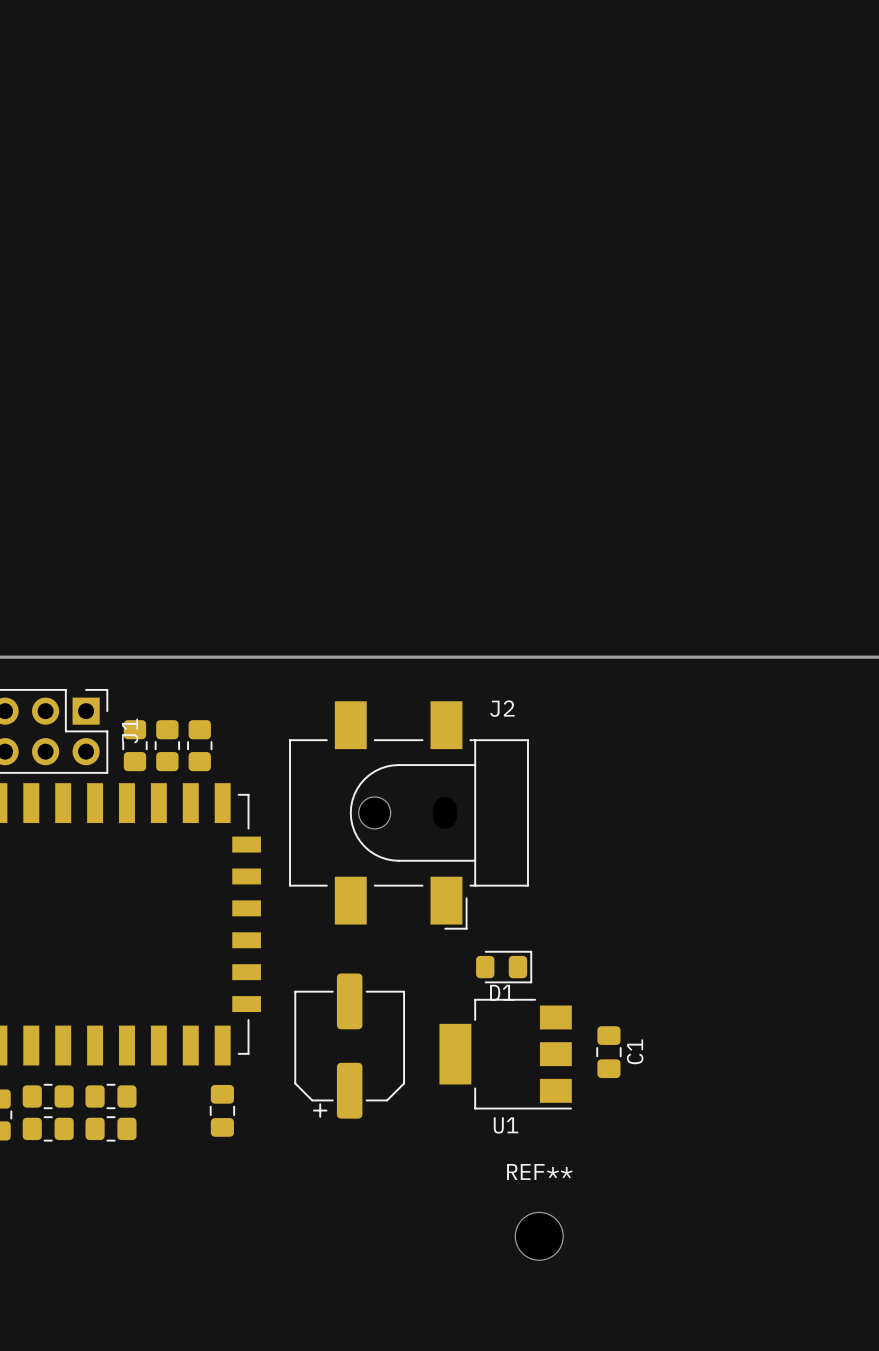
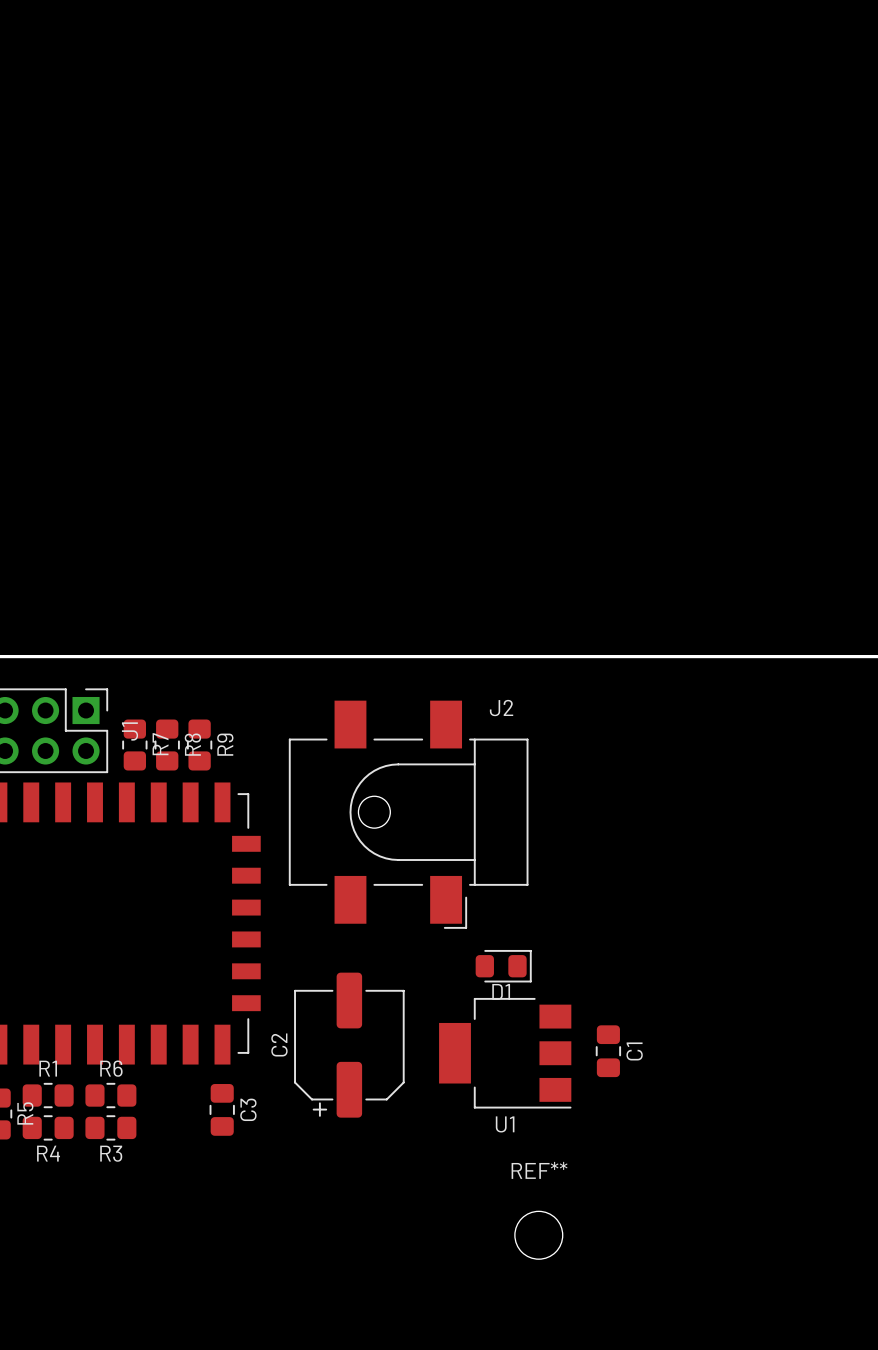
R7 name: none -> R7 (160, 744)
R8 name: none -> R8 (192, 744)
R9 name: none -> R9 (225, 744)
C2 name: none -> C2 (279, 1044)
R1 name: none -> R1 (48, 1068)
R6 name: none -> R6 (111, 1068)
C3 name: none -> C3 (248, 1109)
R5 name: none -> R5 (25, 1113)
R4 name: none -> R4 (48, 1153)
R3 name: none -> R3 (111, 1153)

